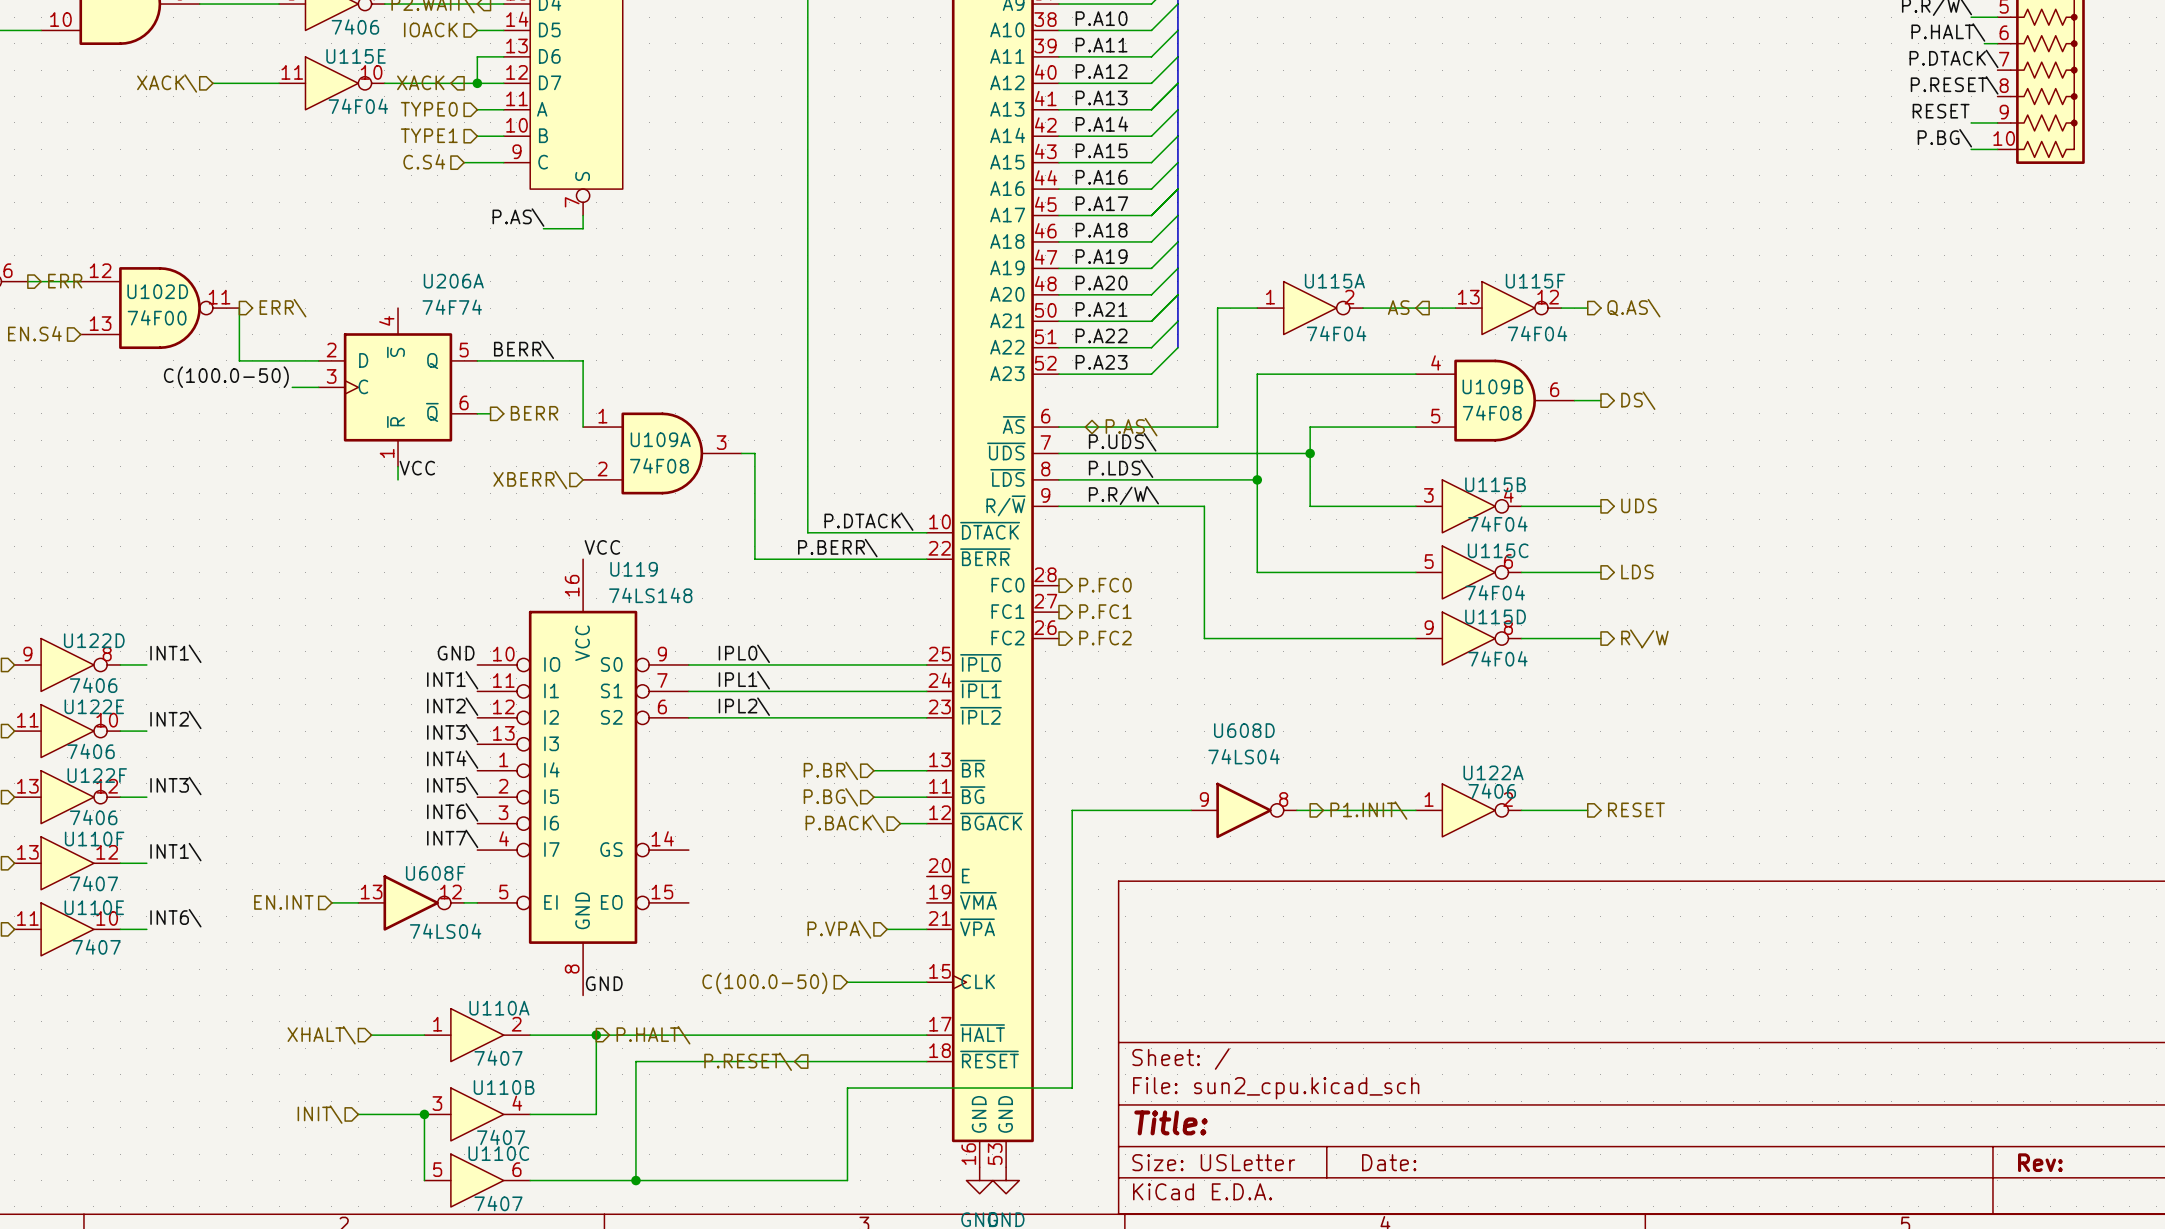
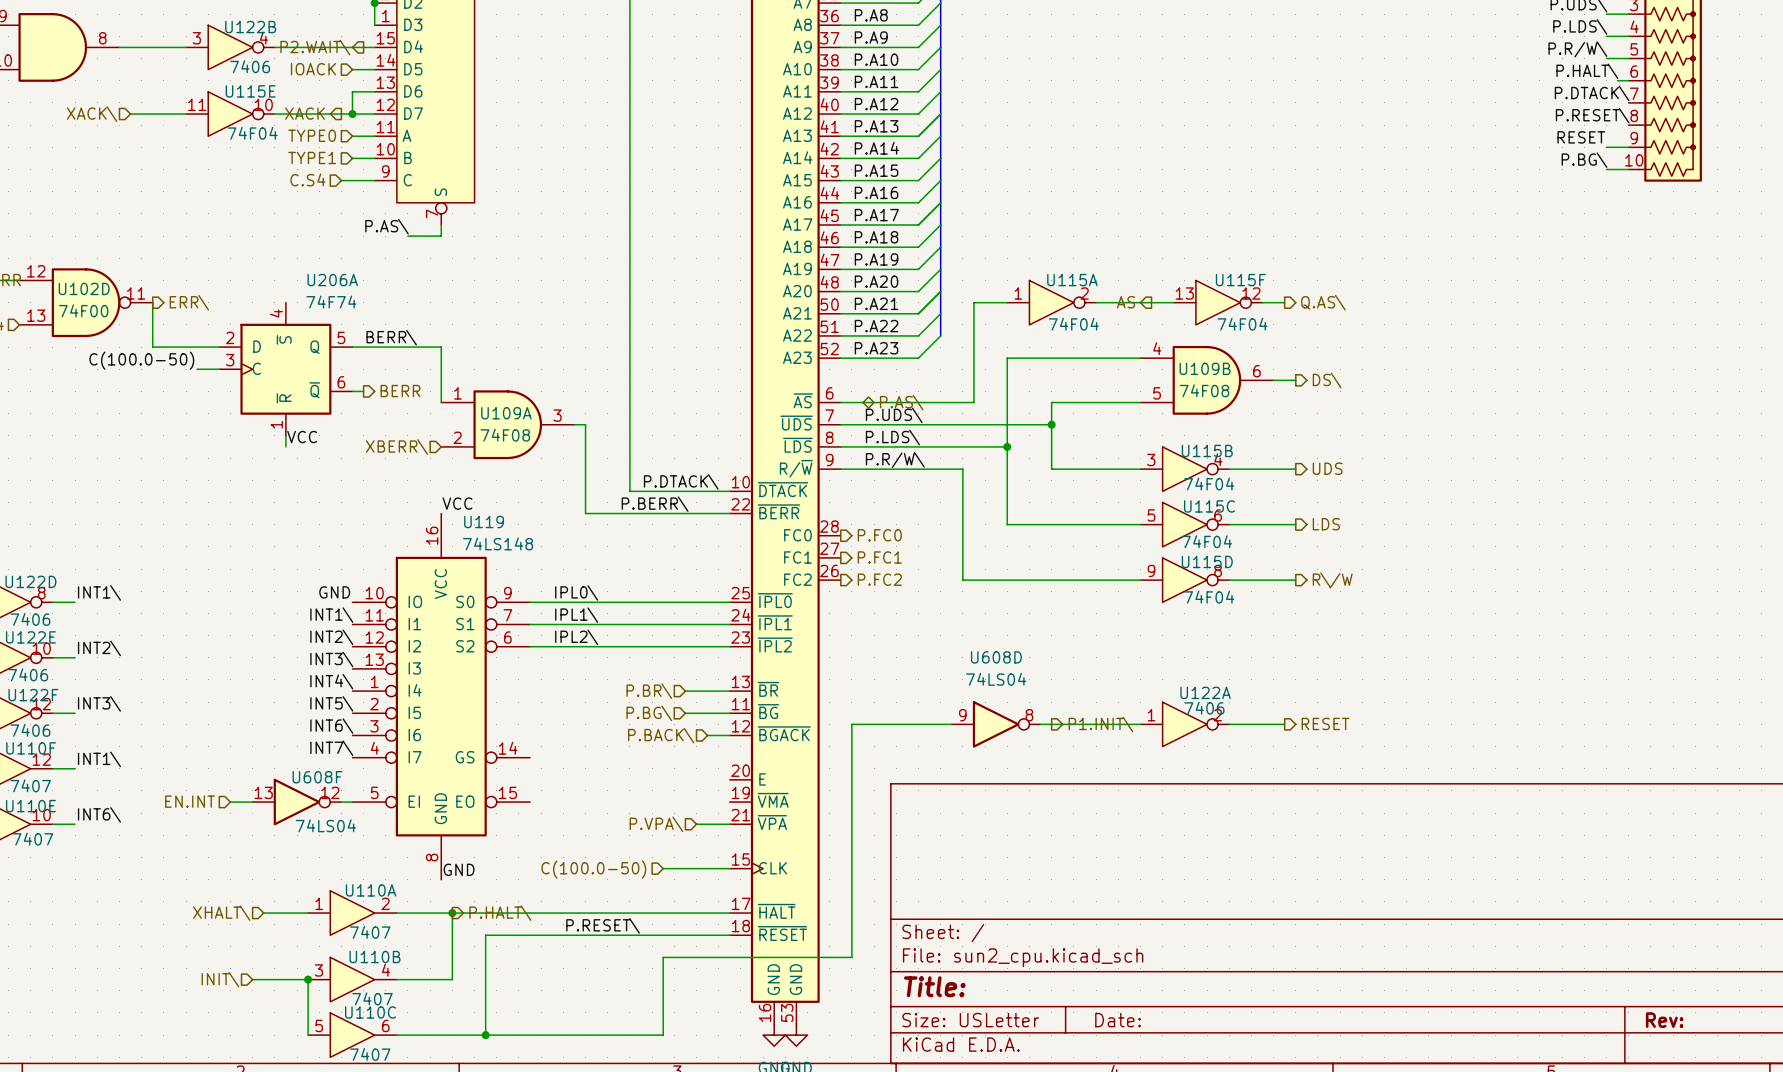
label: none -> P.RESET\ (603, 925)
hierarchical label: P.RESET\ (748, 1061) -> none

